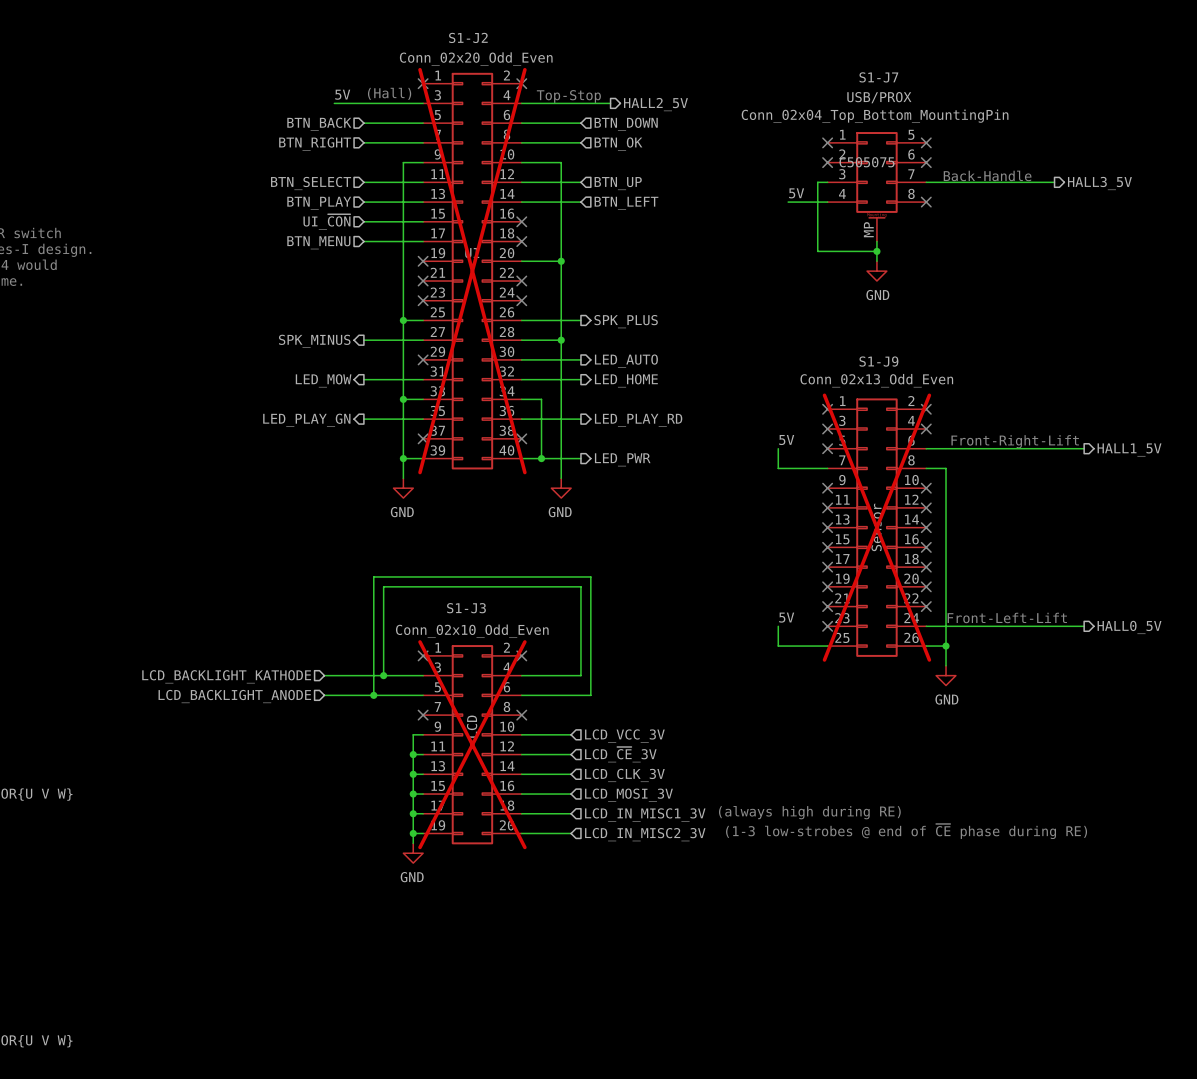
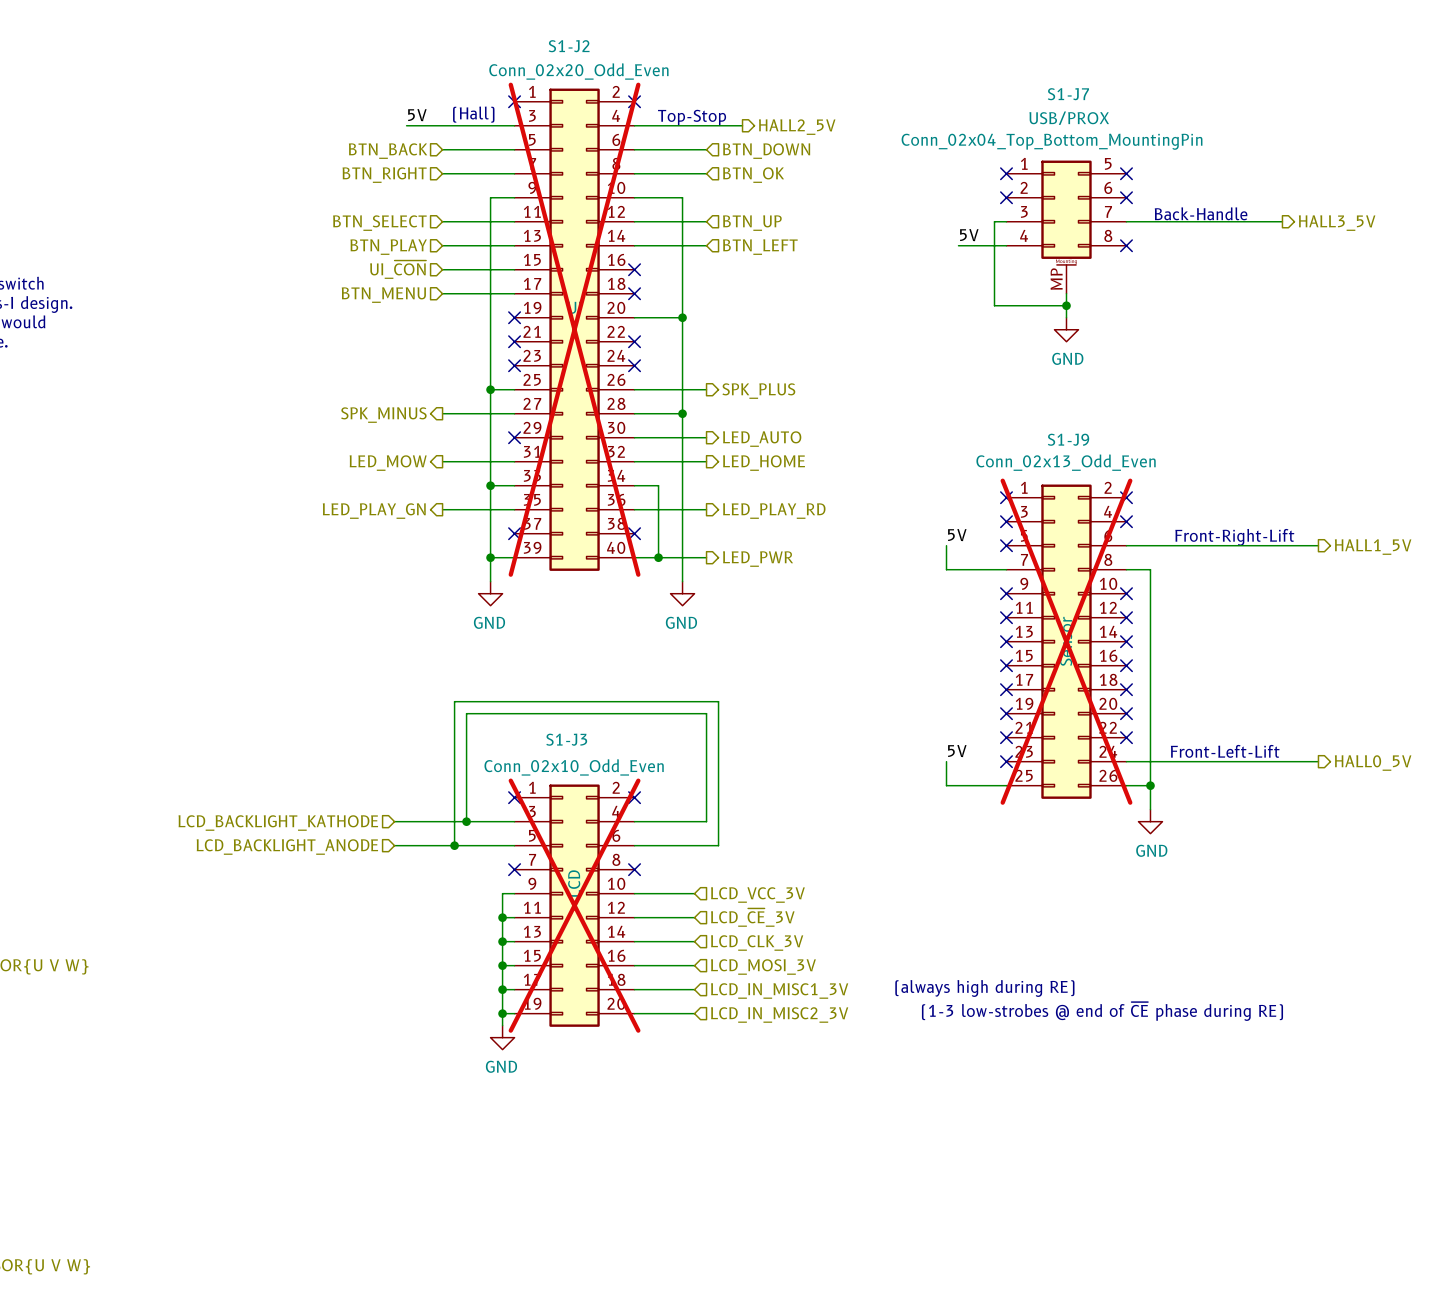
S1-J7 text: C505075 (867, 162) -> none

